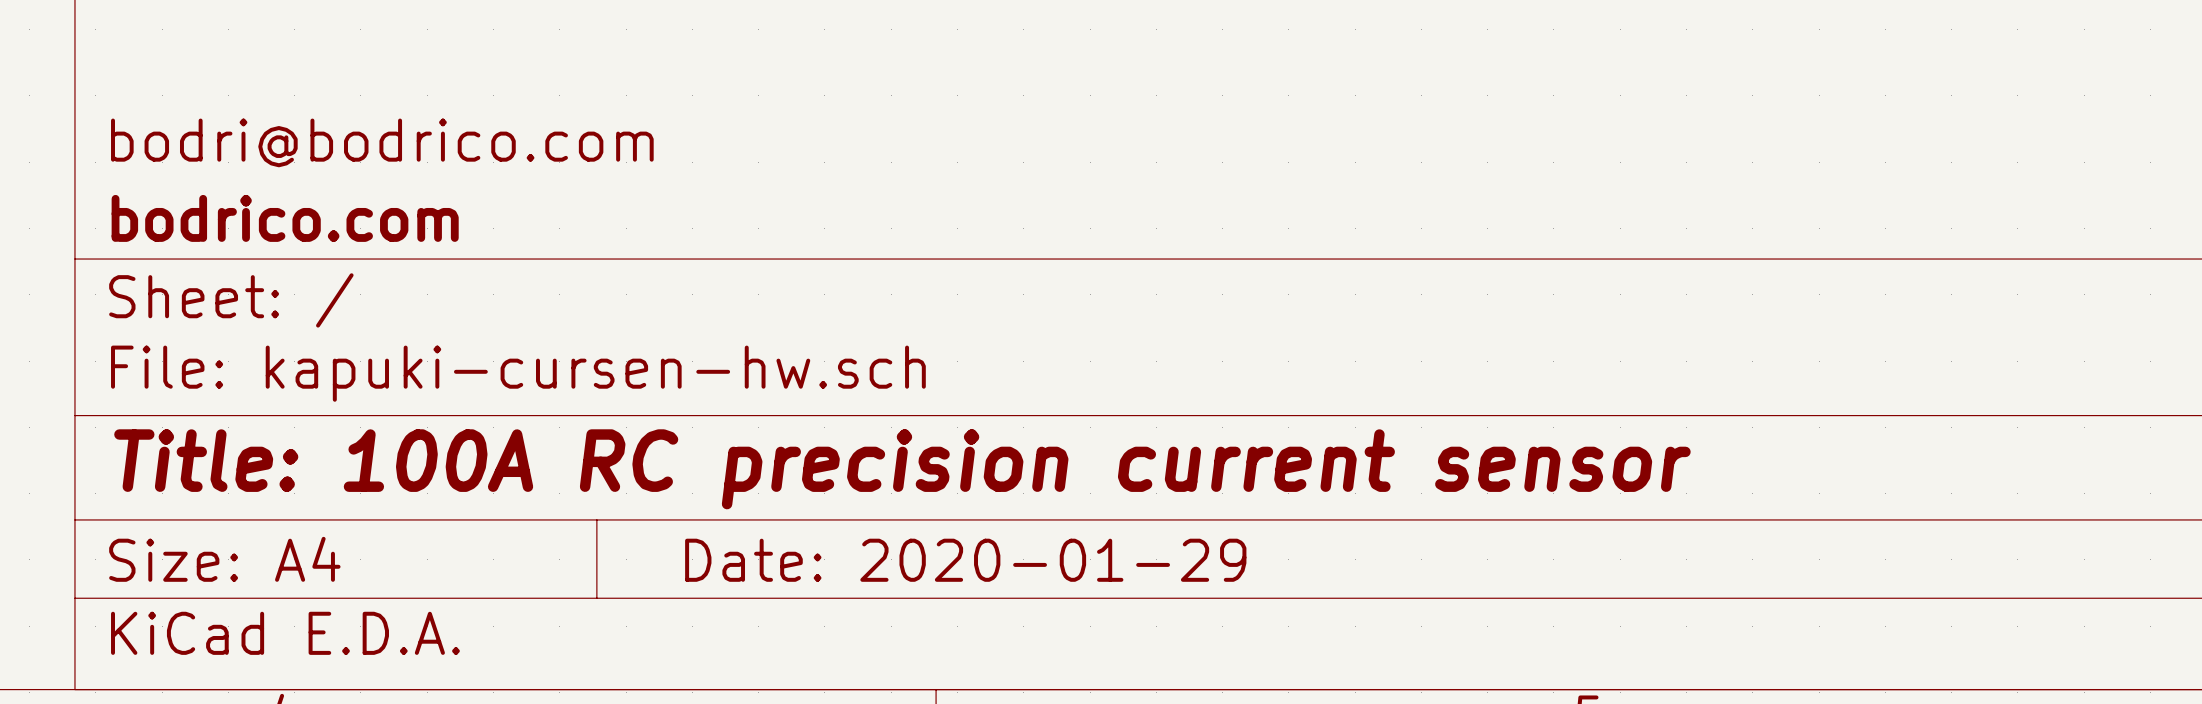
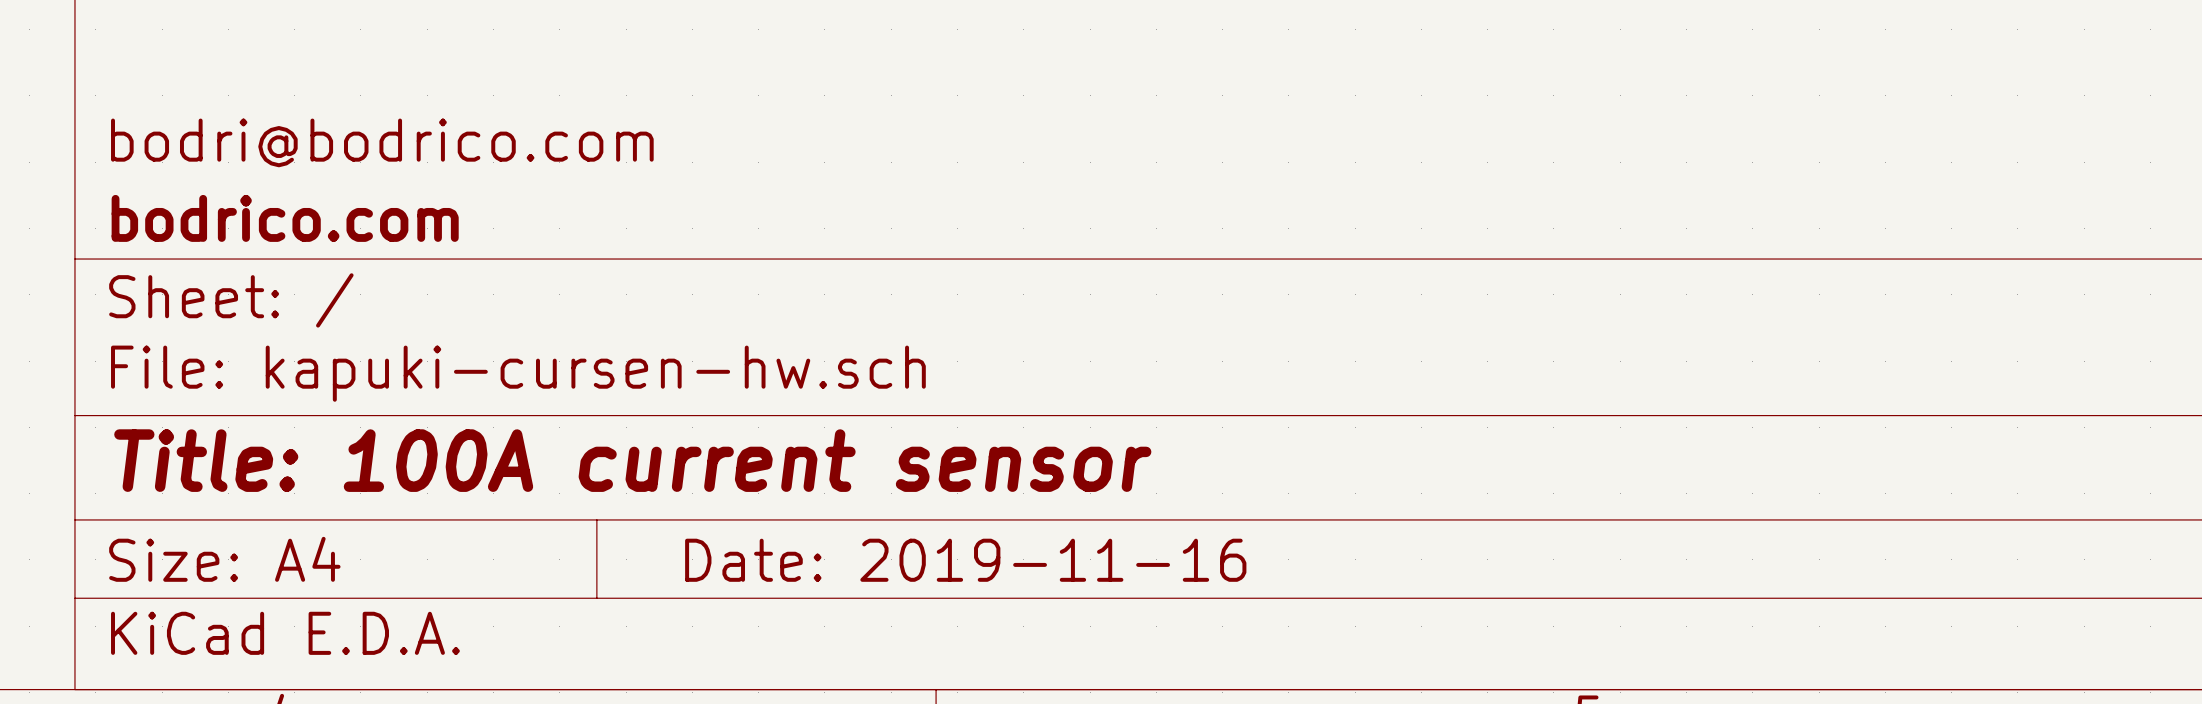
title block: Title: 100A RC precision current sensor (902, 469) -> Title: 100A current sensor (632, 460)
title block: Date: 2020-01-29 (965, 560) -> Date: 2019-11-16 (965, 560)

